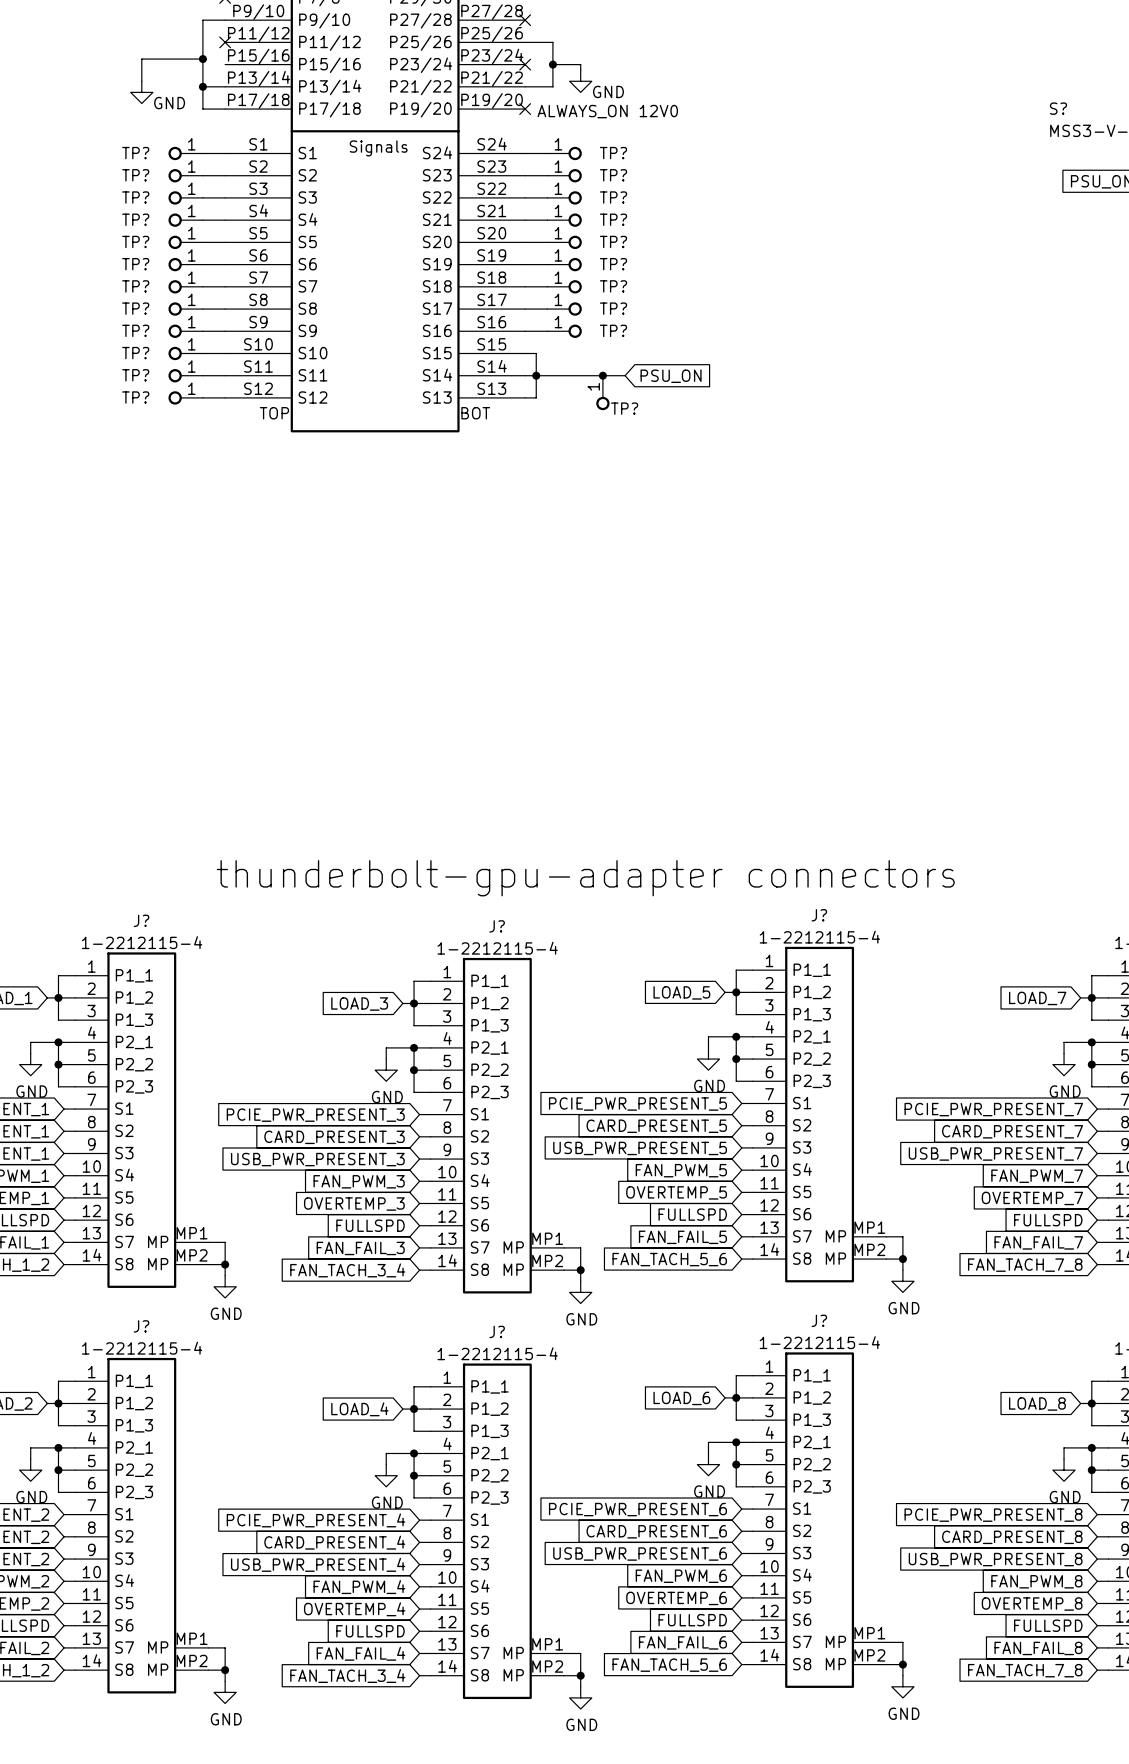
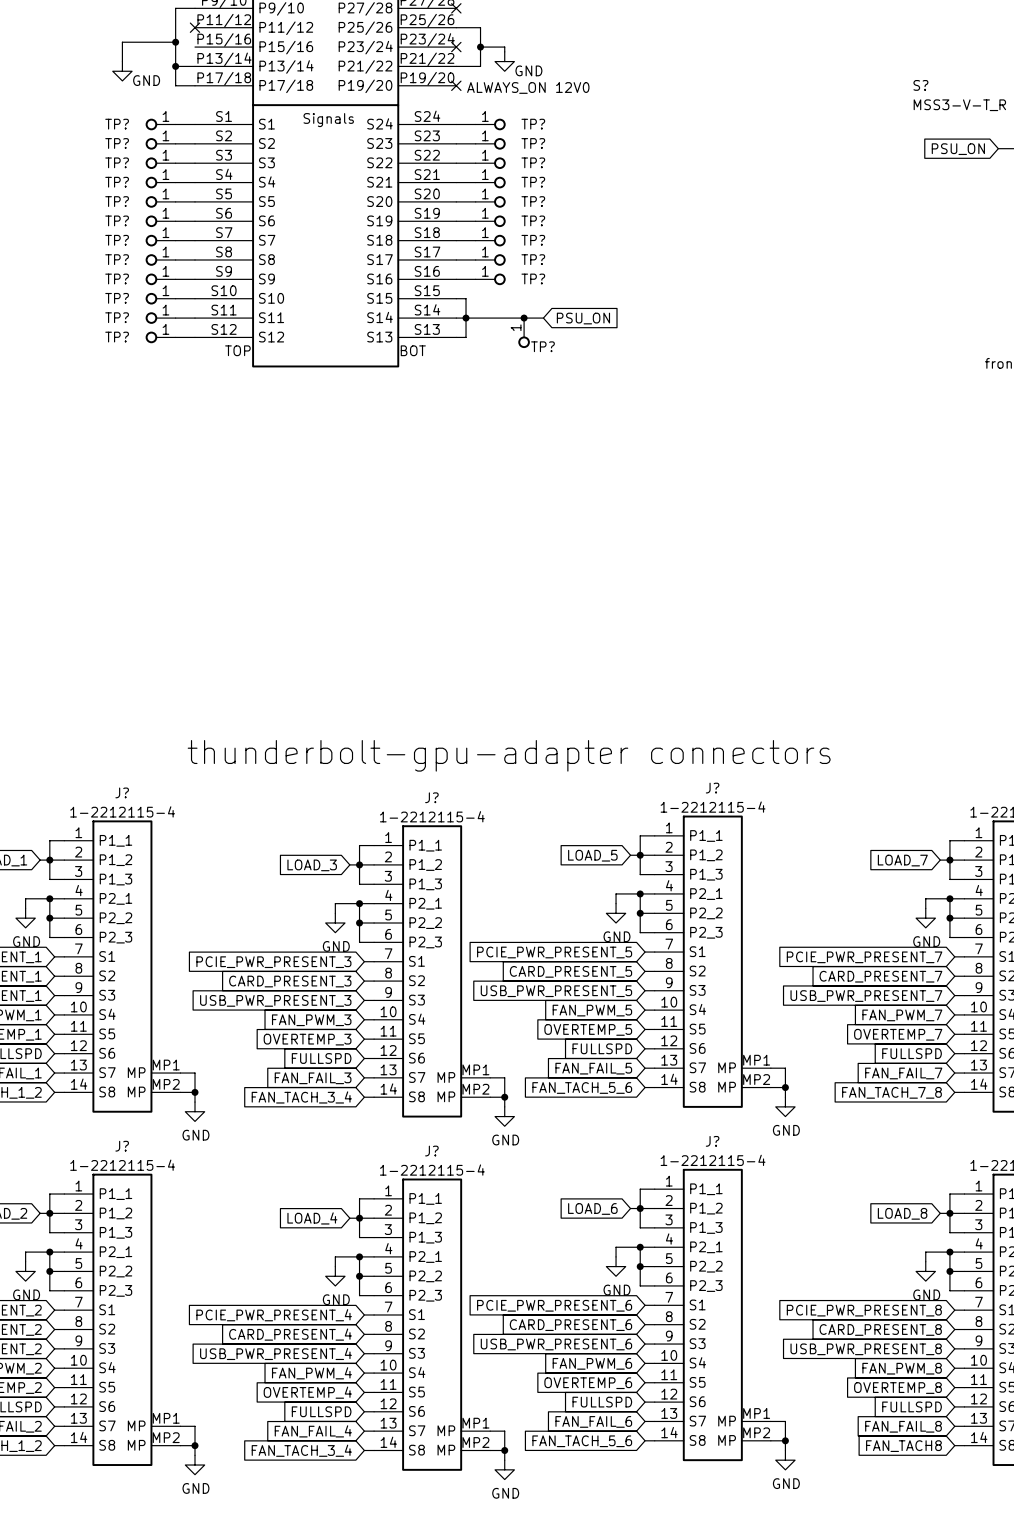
global label: FAN_TACH_7_8 (1025, 1670) -> FAN_TACH8 (903, 1446)

